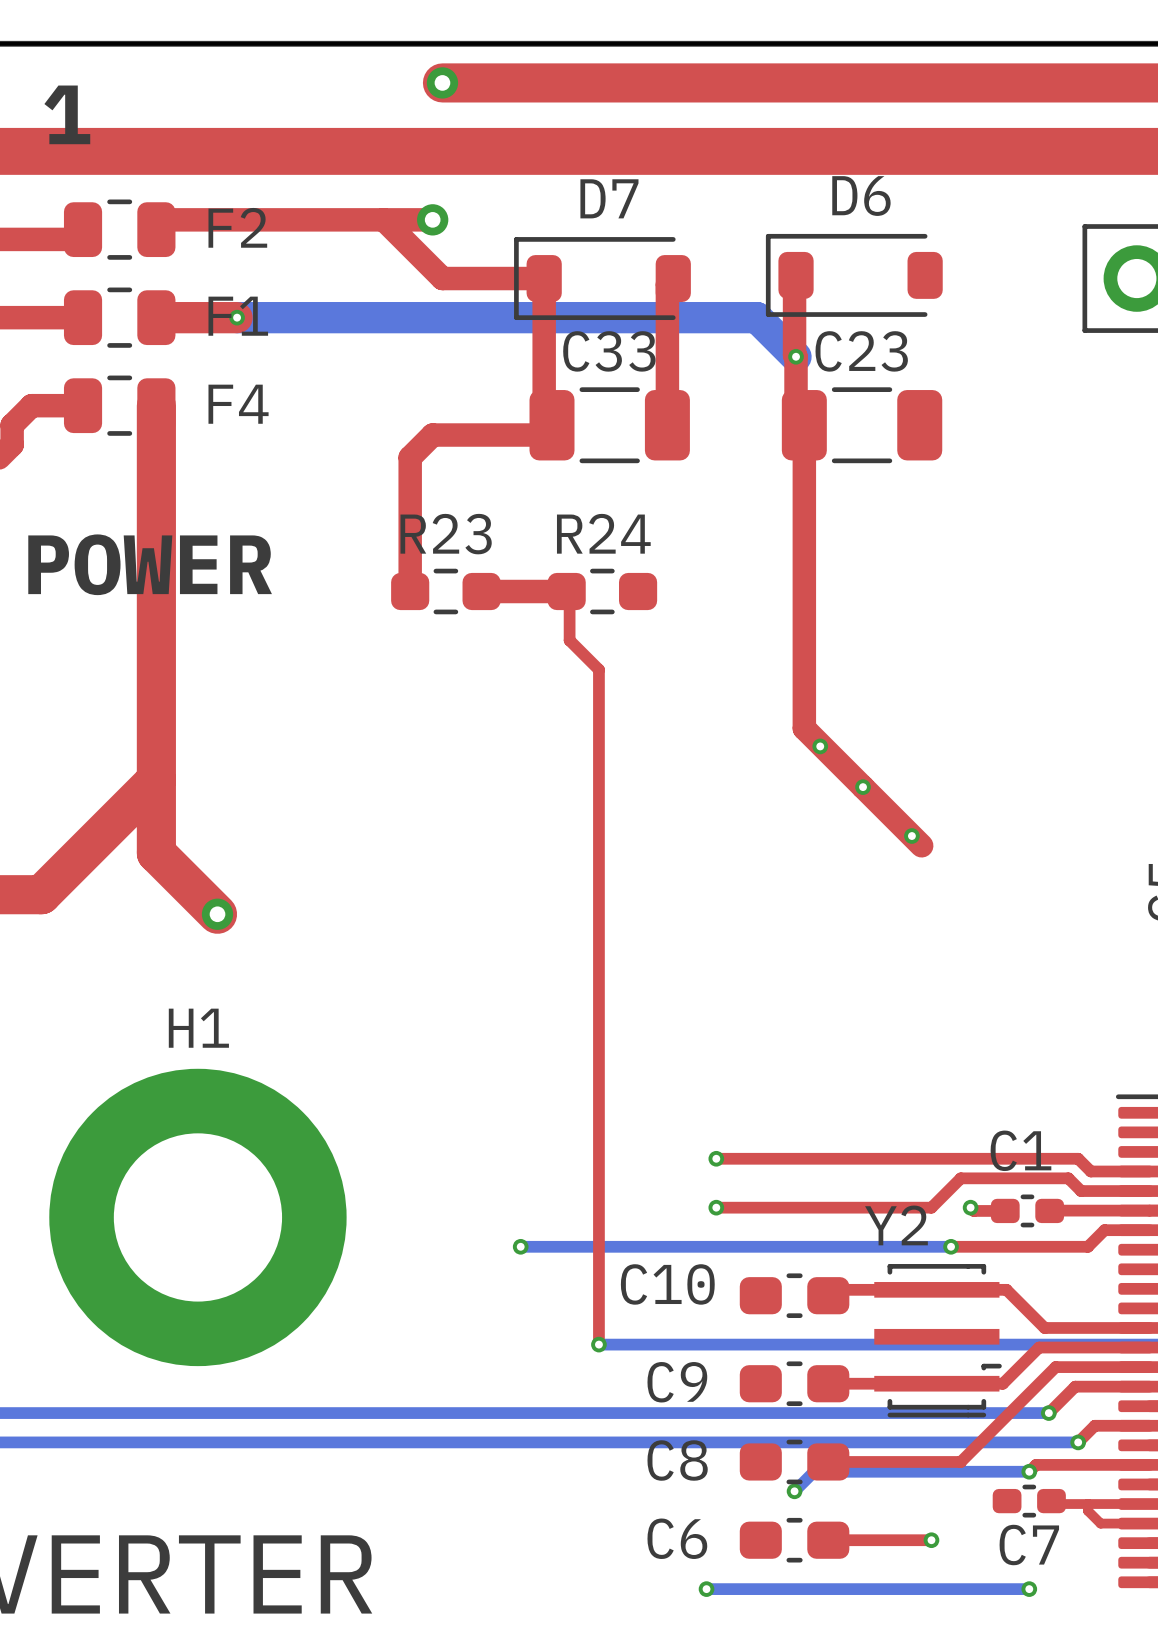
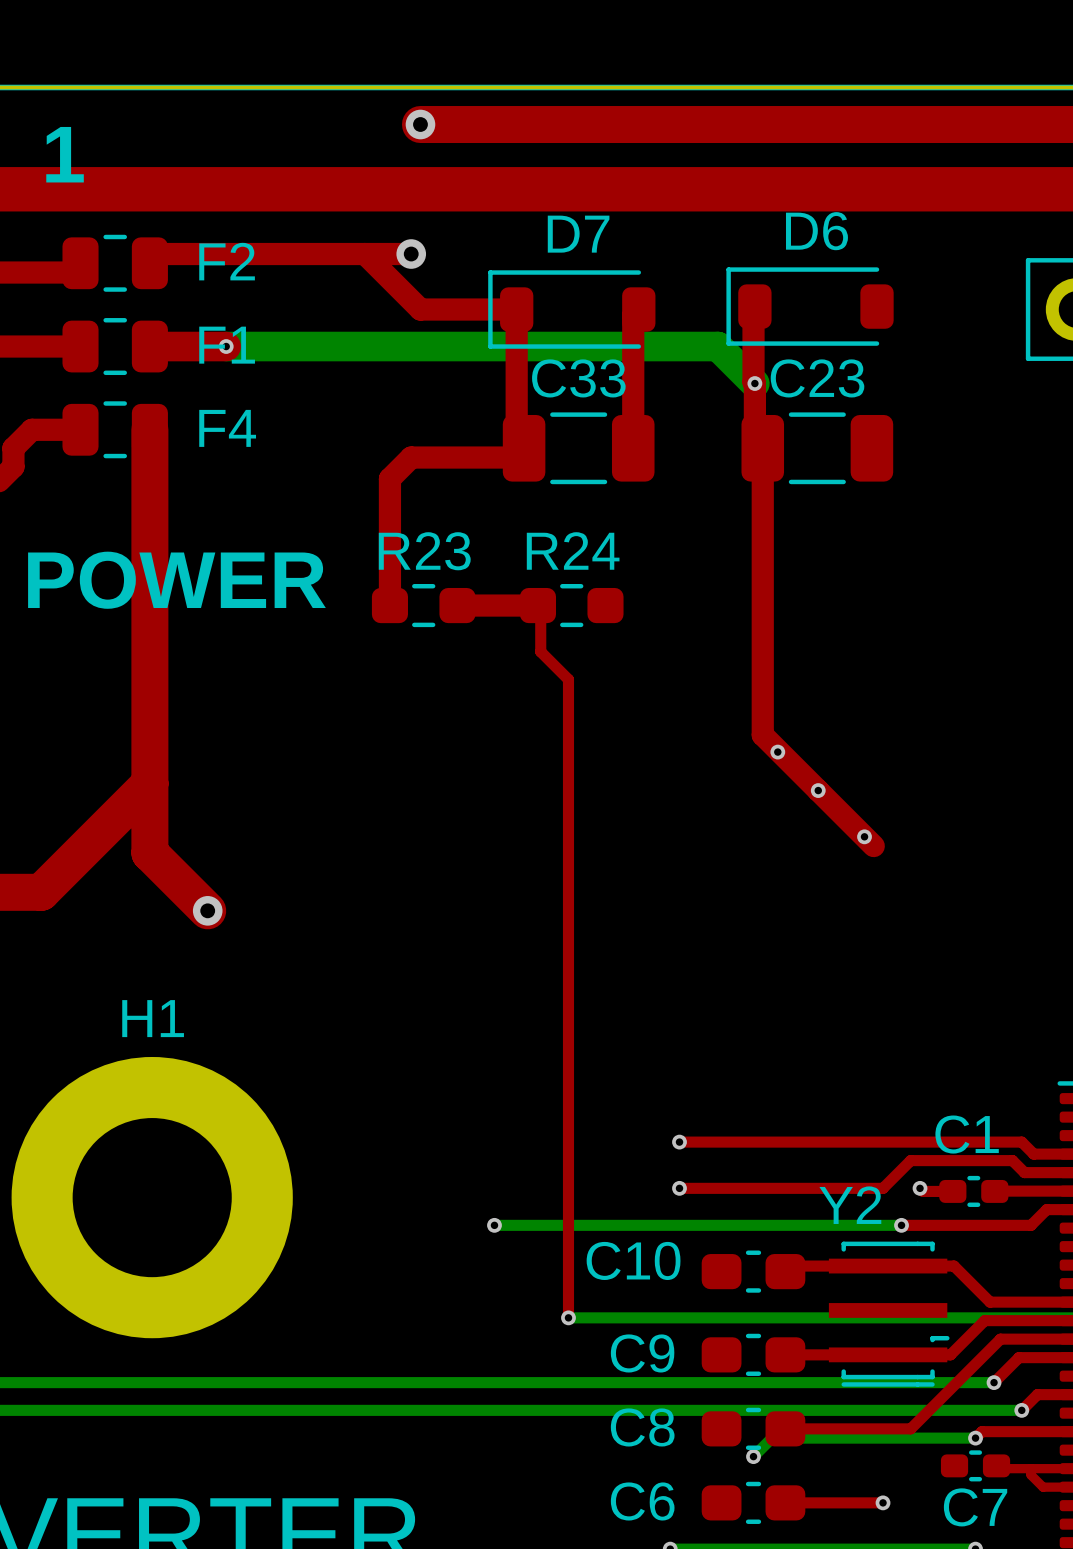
H1 position: (197, 1217) -> (152, 1197)

